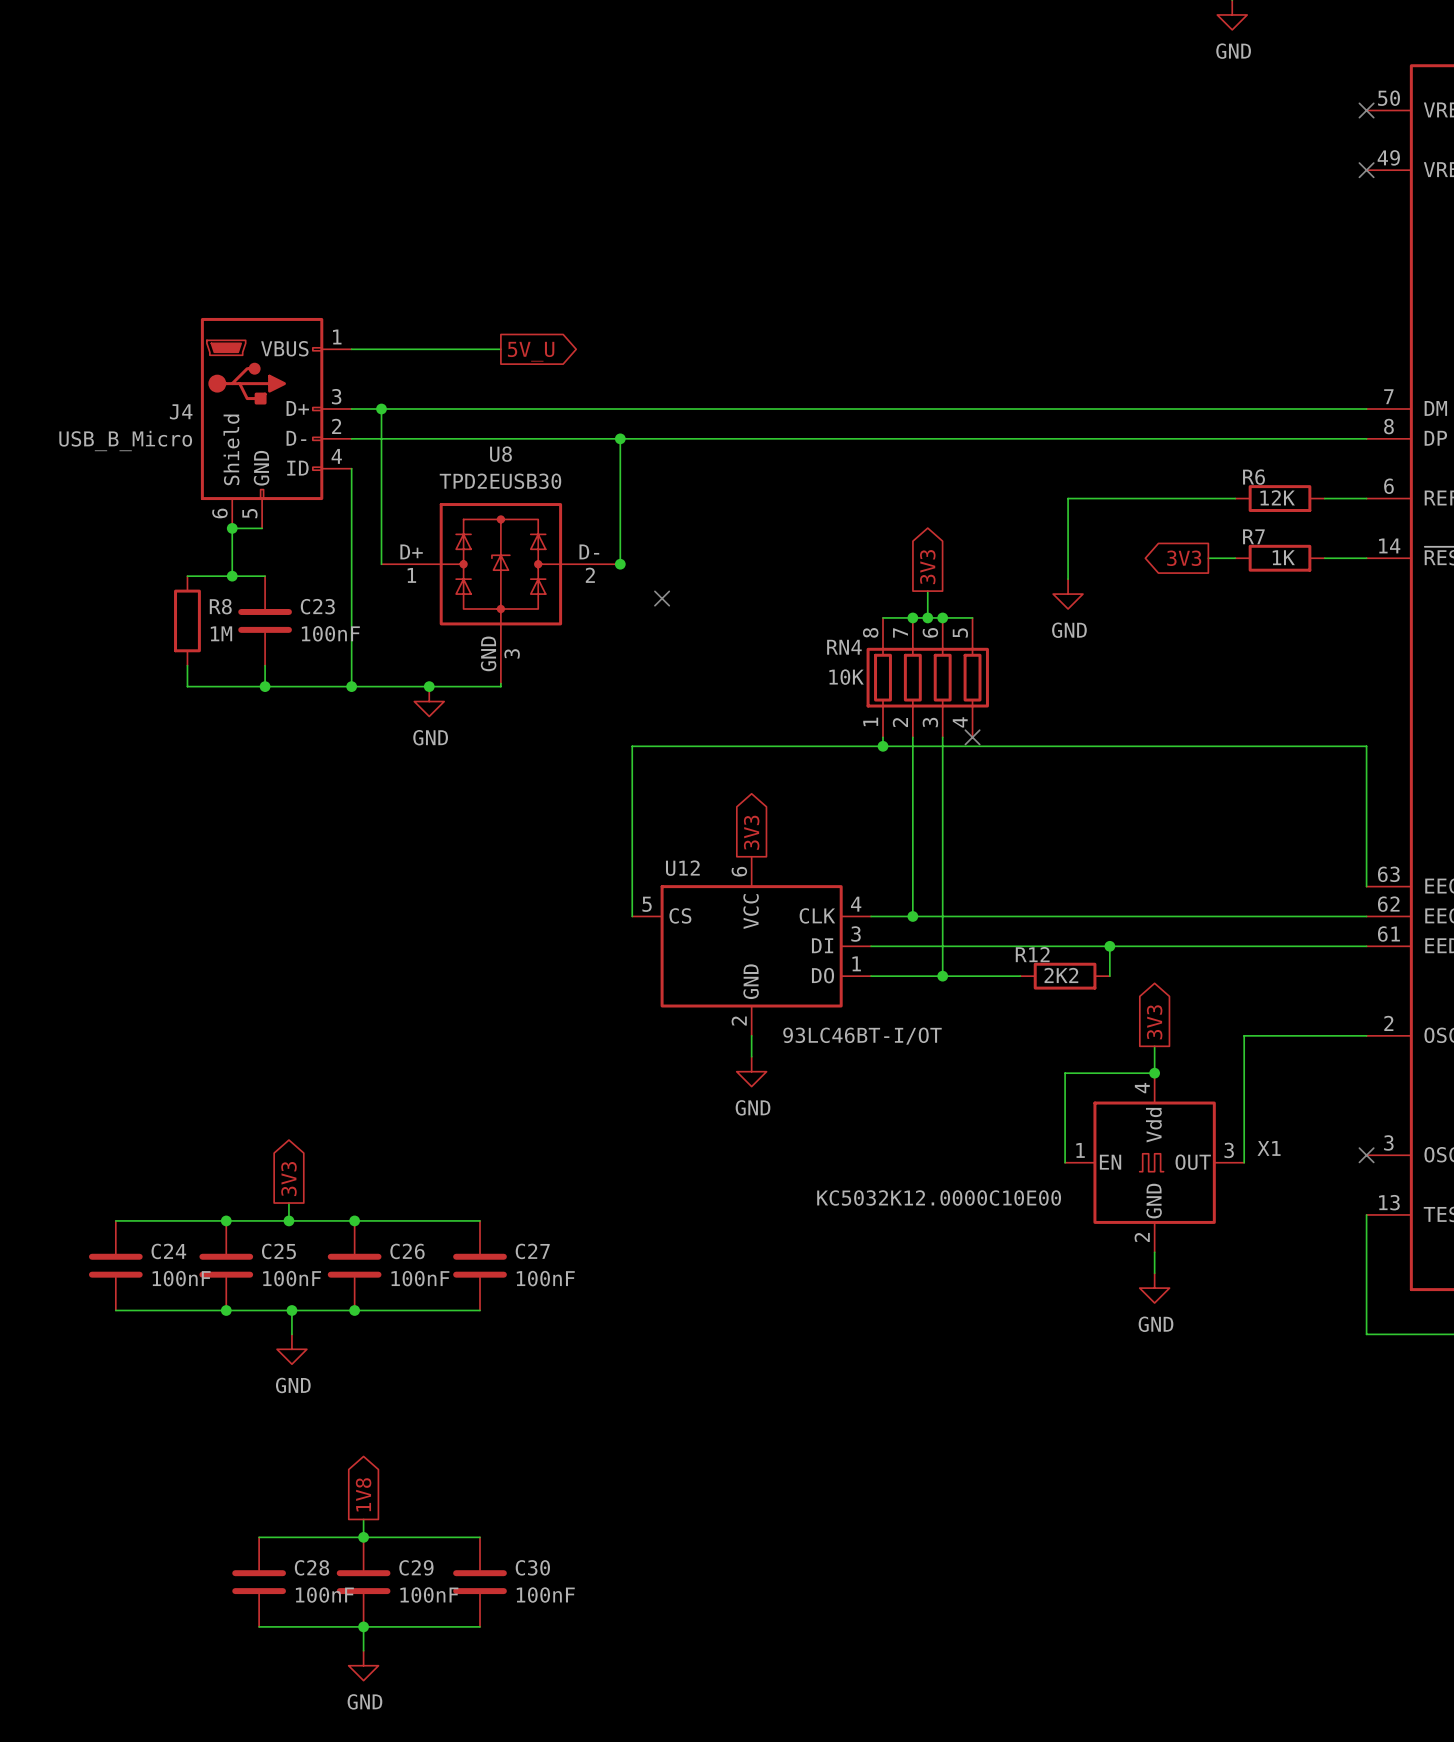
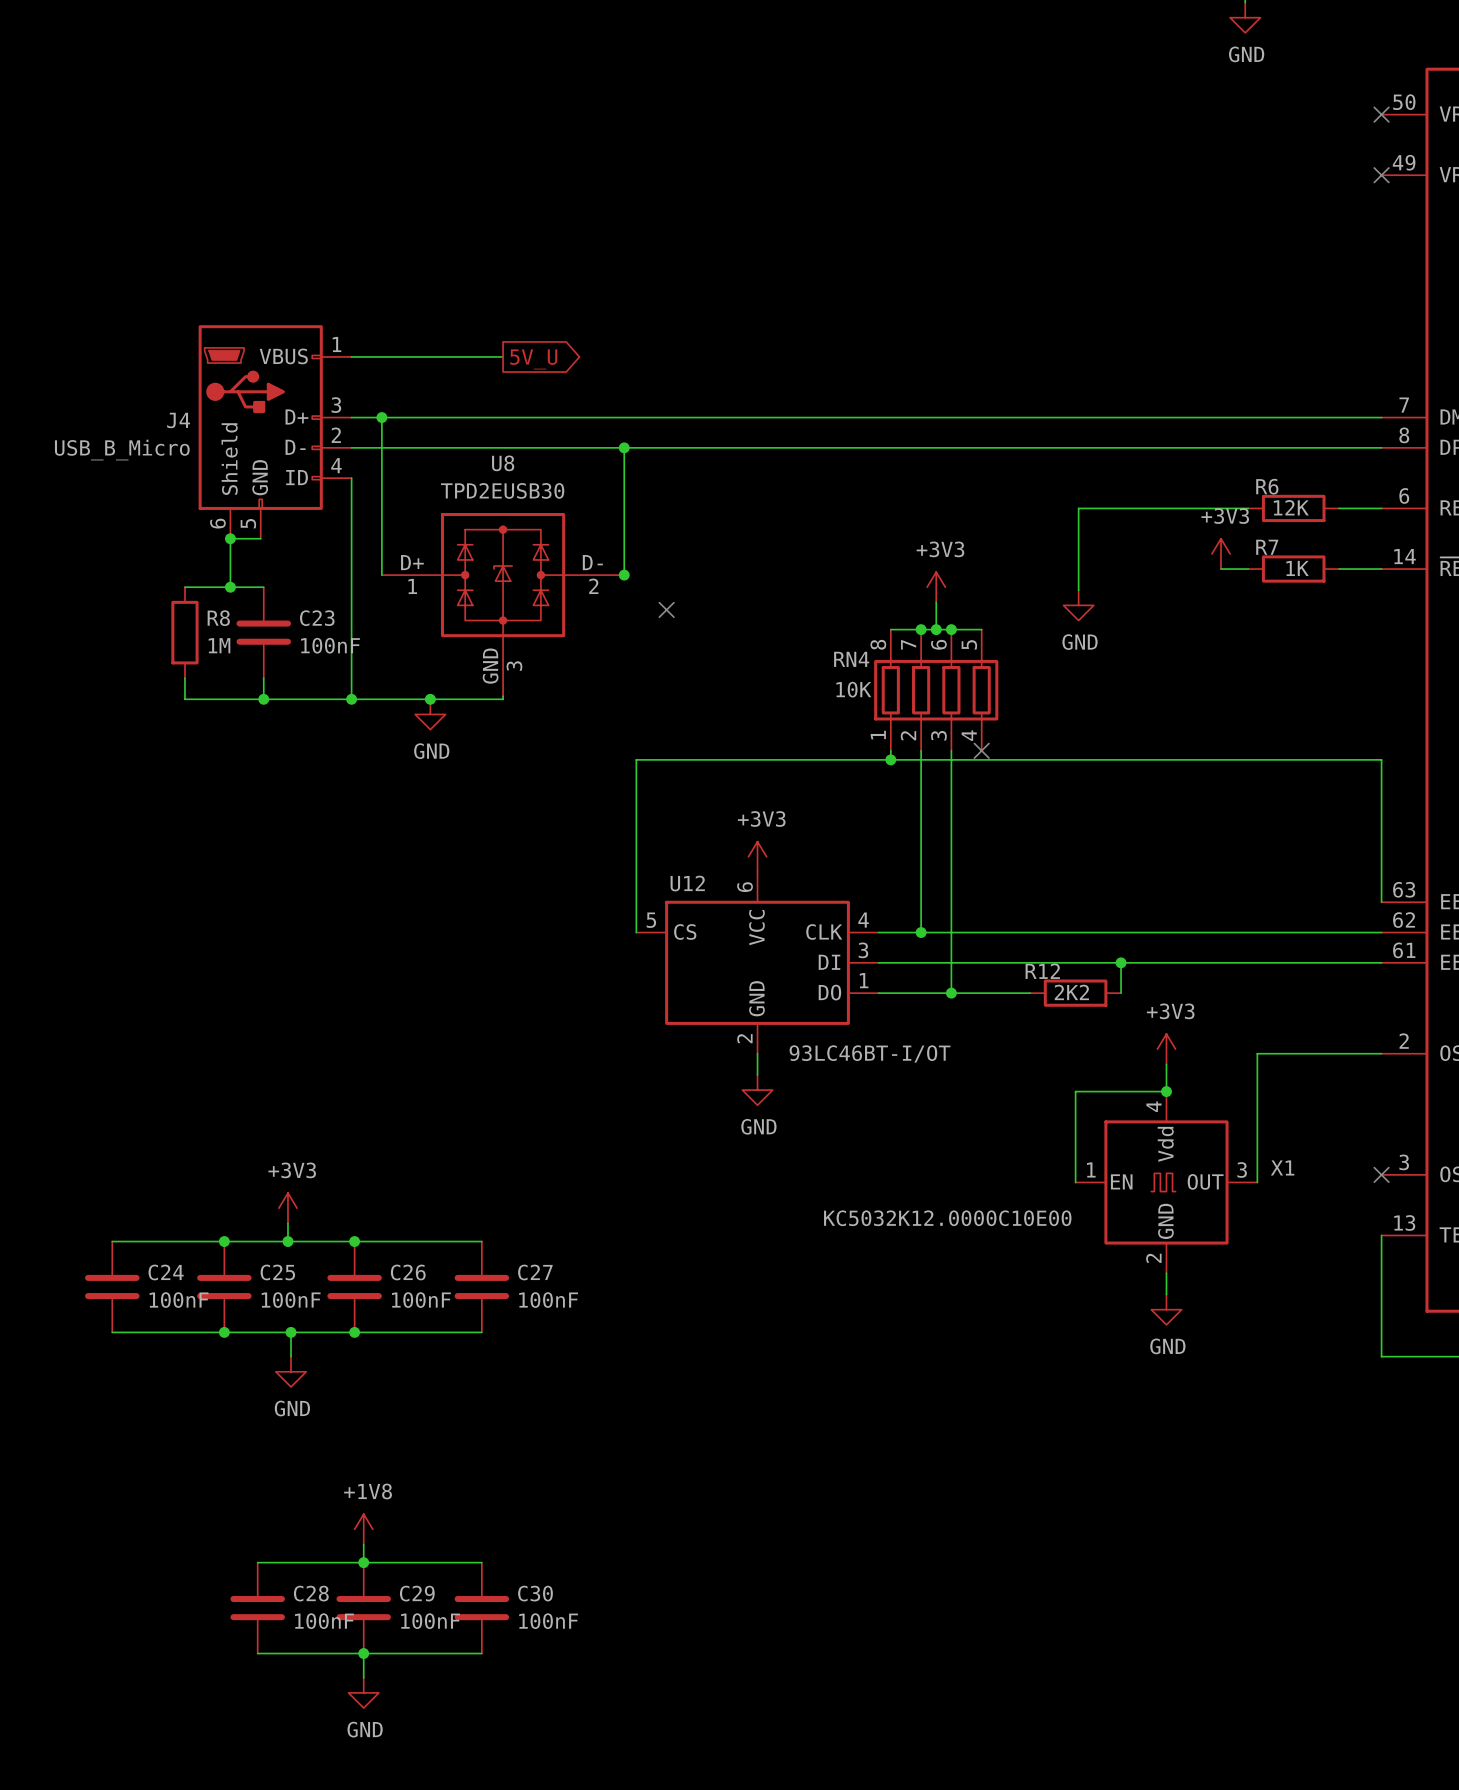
power symbol: none -> +3V3 (1221, 553)
global label: 3V3 (1184, 558) -> none
global label: 3V3 (927, 567) -> none
power symbol: none -> +3V3 (936, 587)
global label: 3V3 (751, 832) -> none
power symbol: none -> +3V3 (757, 856)
global label: 3V3 (1154, 1022) -> none
power symbol: none -> +3V3 (1166, 1049)
global label: 3V3 (288, 1179) -> none
power symbol: none -> +3V3 (287, 1208)
global label: 1V8 (363, 1494) -> none
power symbol: none -> +1V8 (363, 1529)

